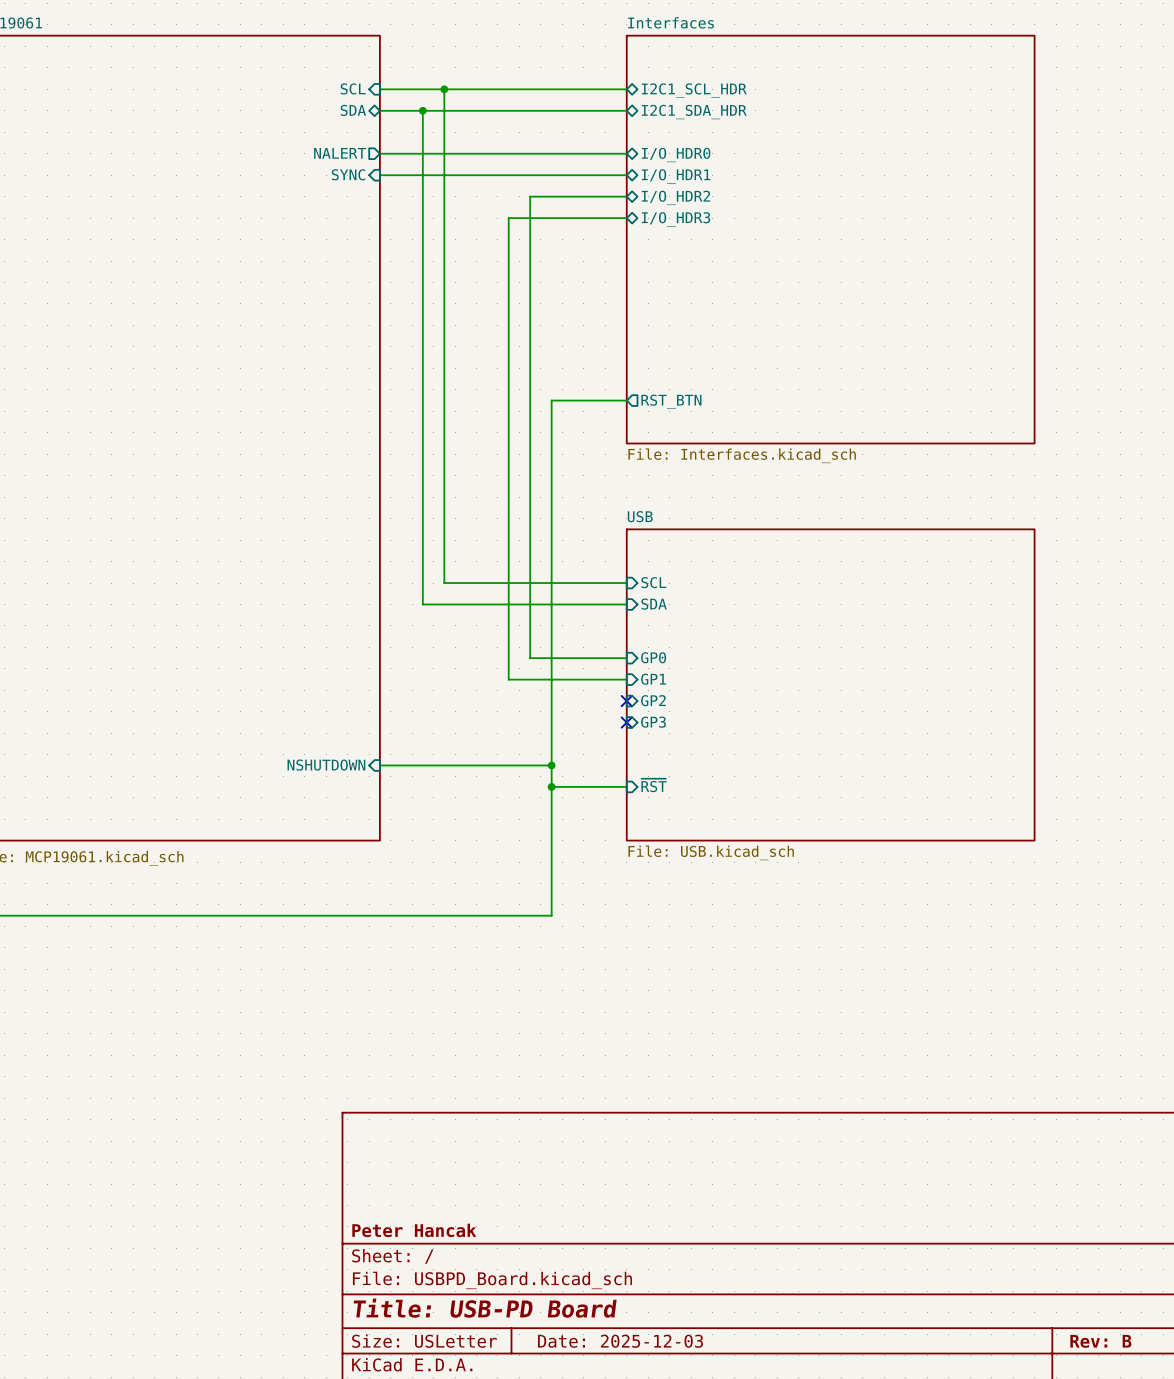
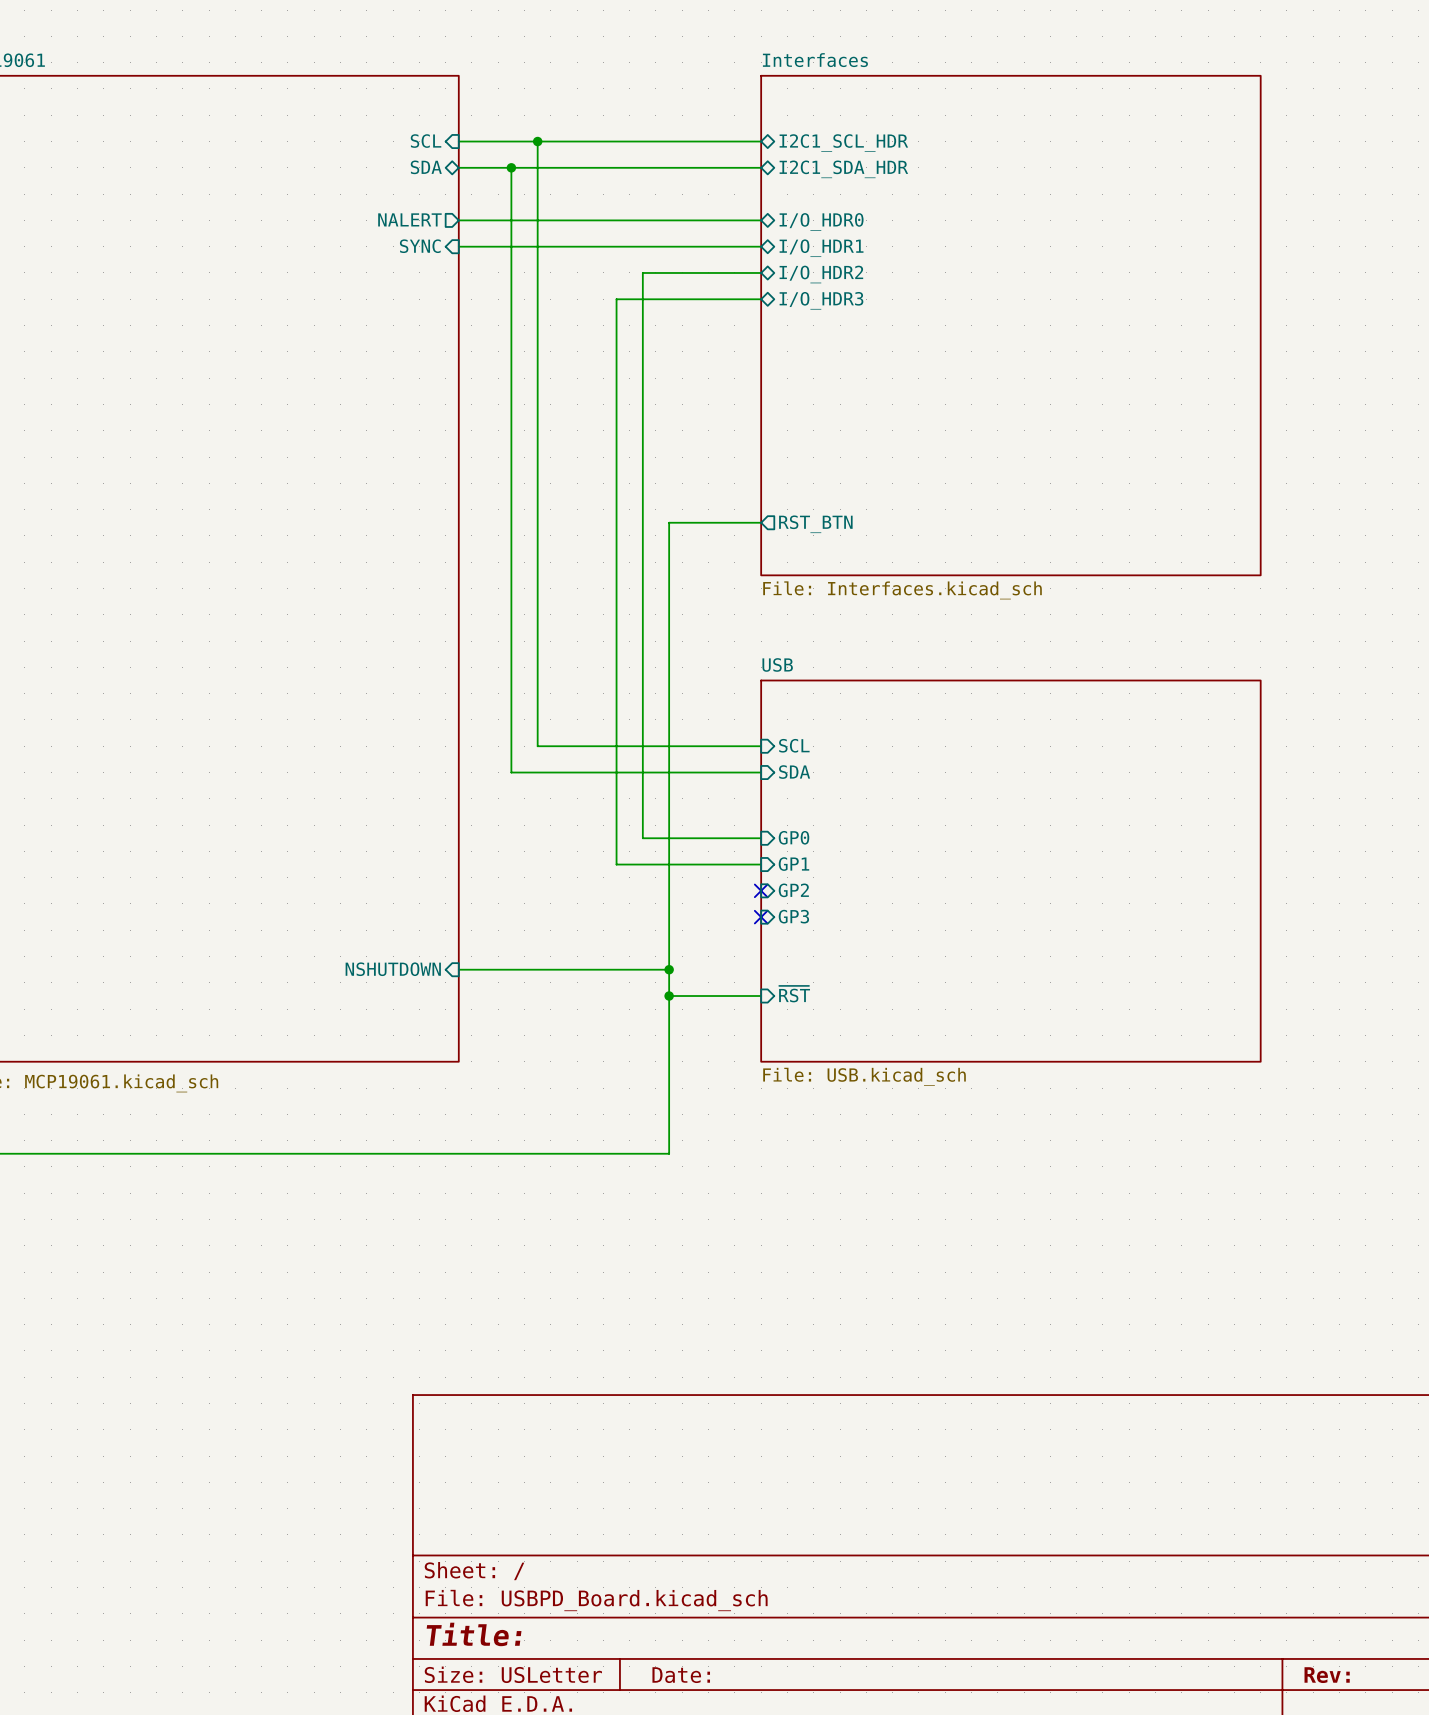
title block: Peter Hancak (414, 1230) -> none
title block: Title: USB-PD Board (485, 1308) -> Title: (474, 1634)
title block: Date: 2025-12-03 (620, 1341) -> Date: (681, 1675)
title block: Rev: B (1100, 1341) -> Rev: (1327, 1675)

